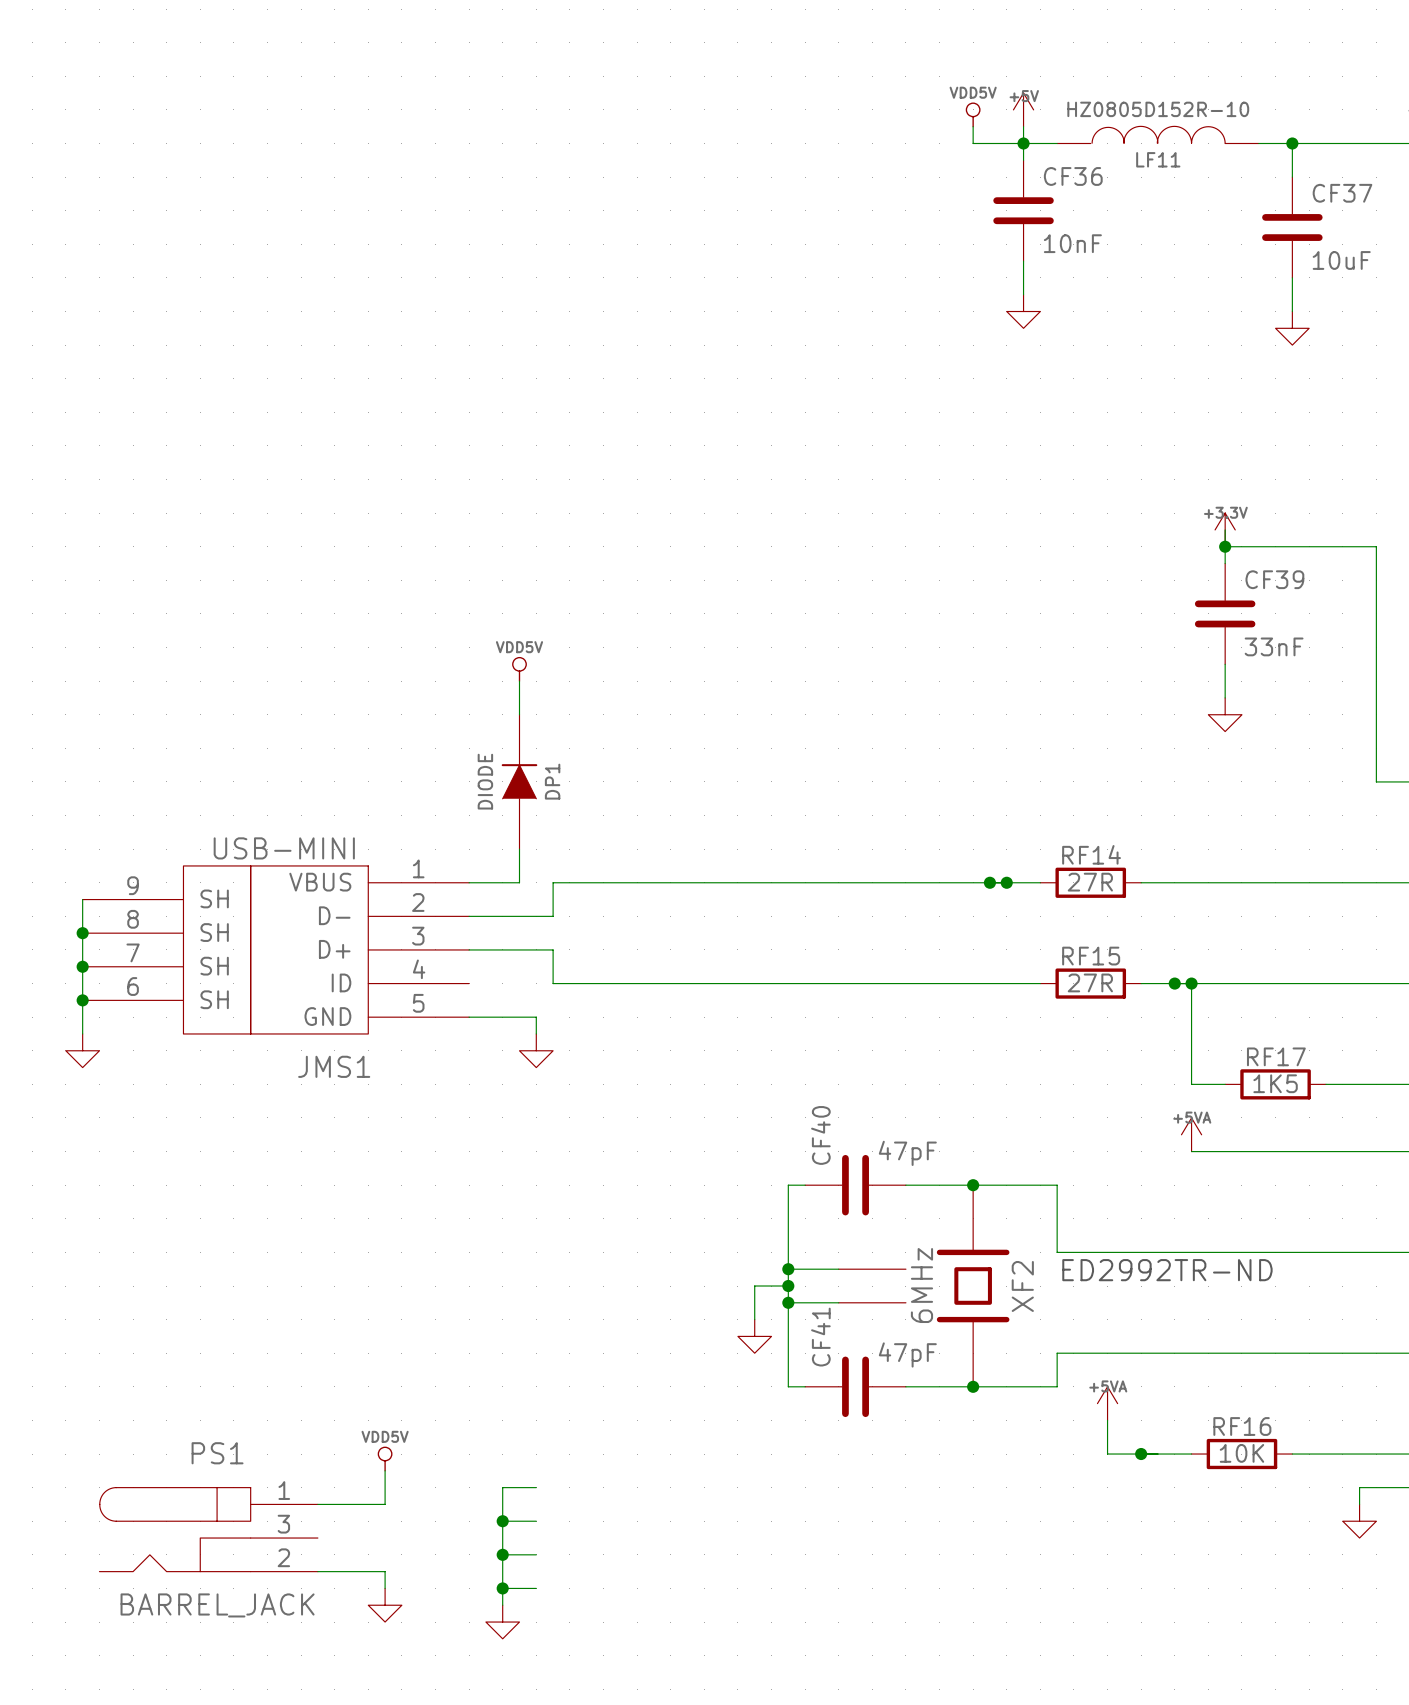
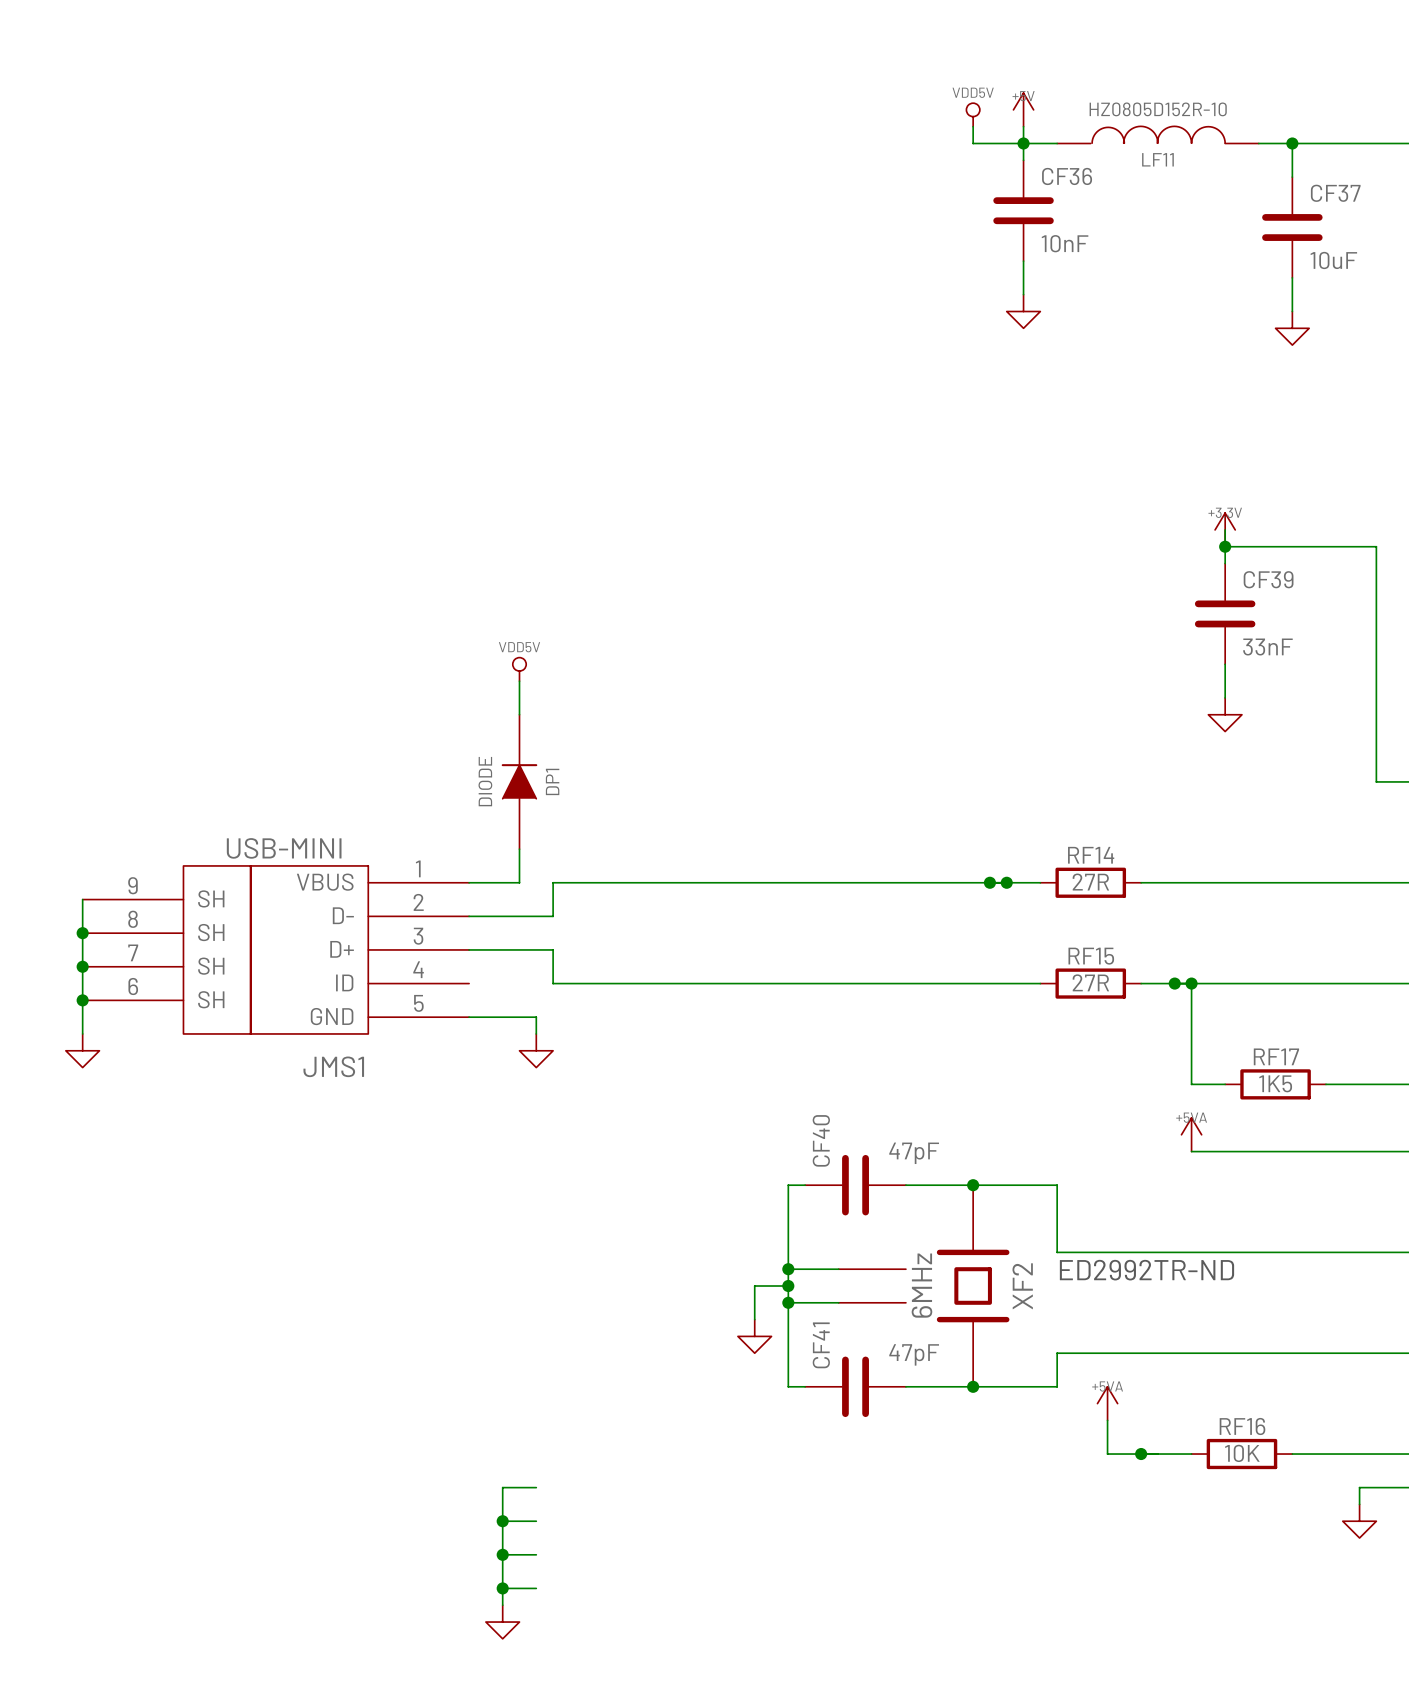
power symbol: VDD5V (385, 1459) -> none
wire: (385, 1470) (385, 1504) (317, 1504) -> none
PS1: BARREL_JACK (208, 1529) -> none
wire: (317, 1571) (385, 1571) (385, 1588) -> none
power symbol: (385, 1605) -> none

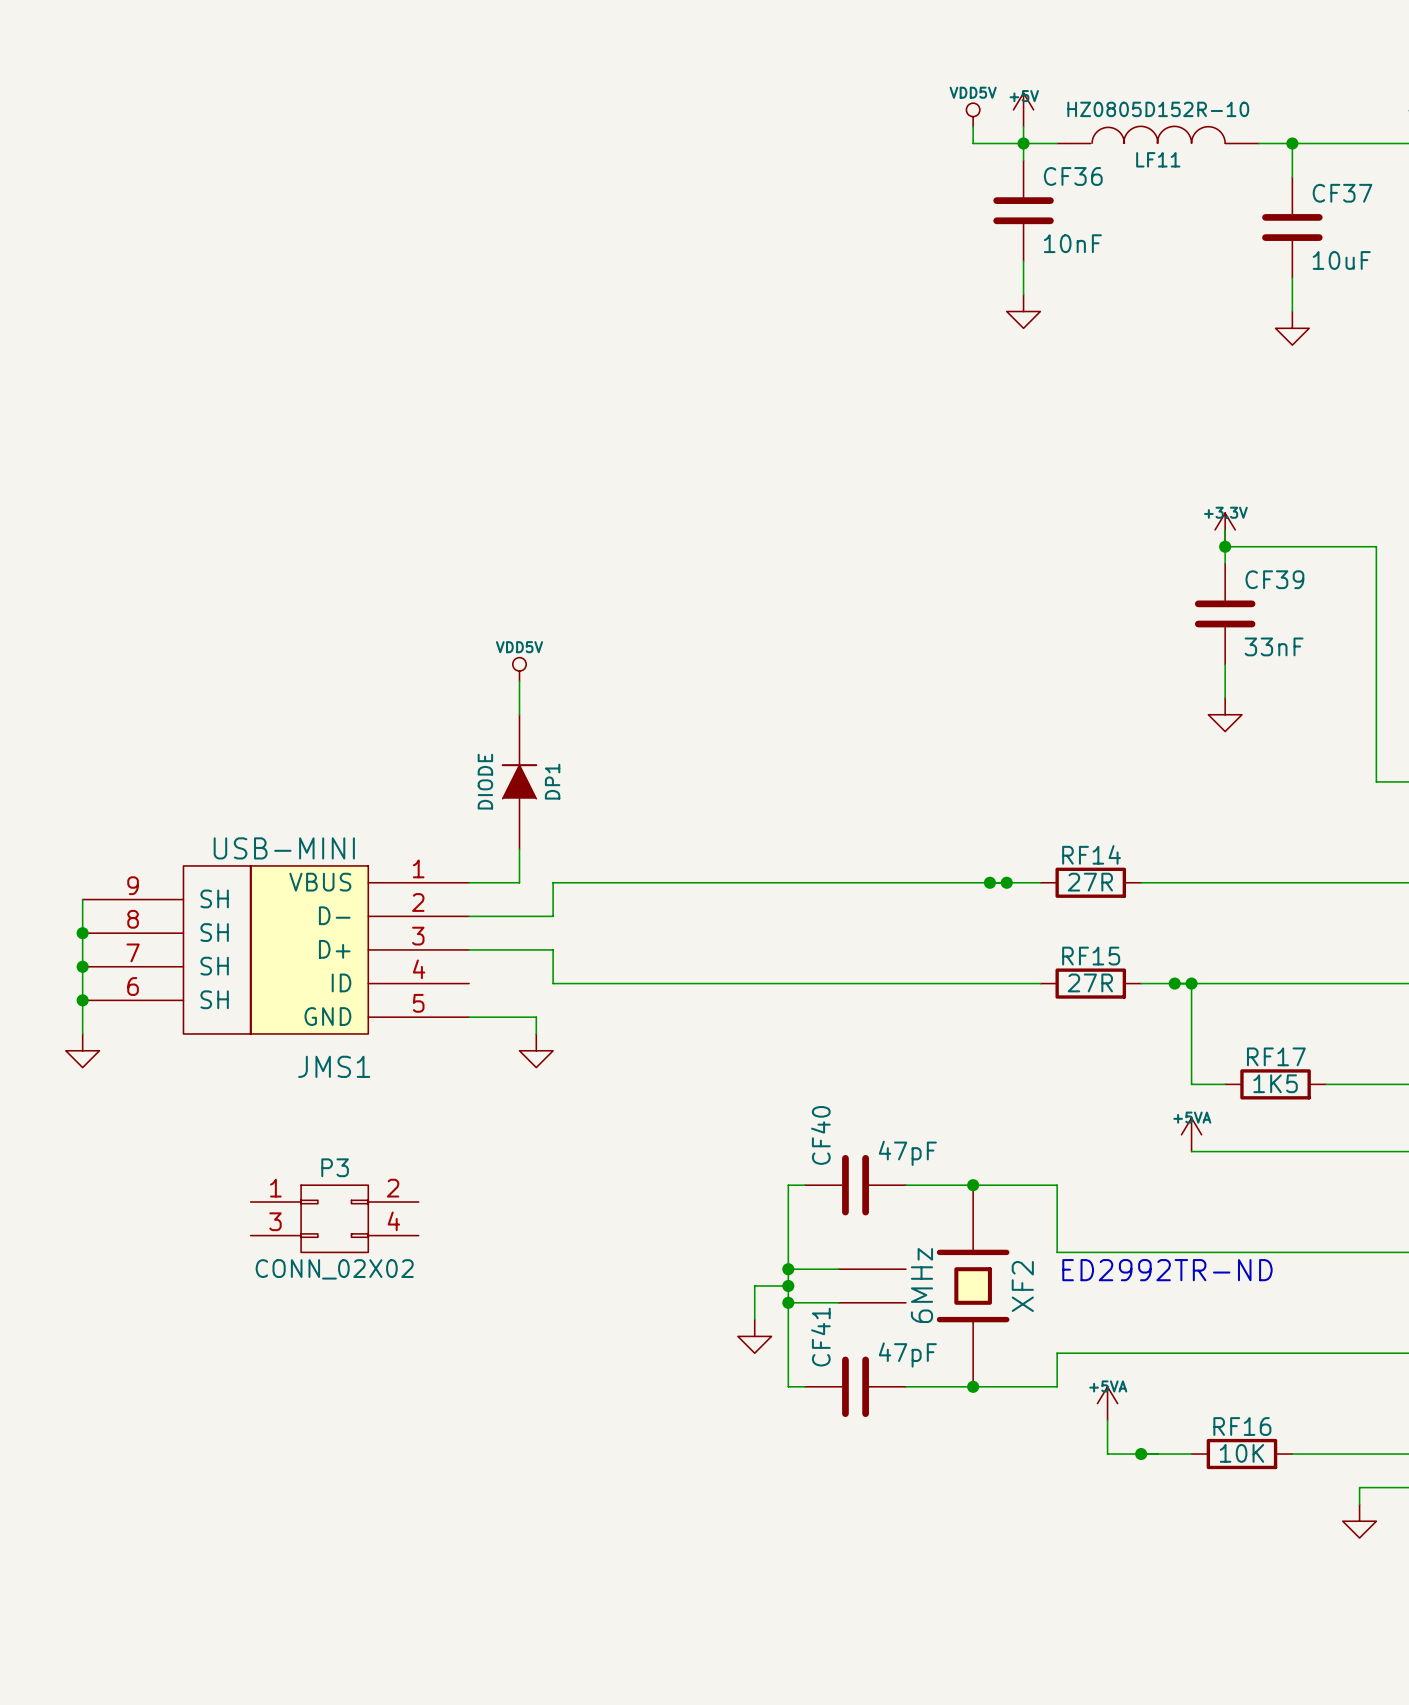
P3: none -> CONN_02X02 (334, 1218)
wire: (536, 1487) (502, 1487) (502, 1605) -> none
wire: (502, 1521) (536, 1521) -> none
junction: (502, 1521) -> none
wire: (502, 1554) (536, 1554) -> none
junction: (502, 1554) -> none
wire: (502, 1588) (536, 1588) -> none
junction: (502, 1588) -> none
power symbol: (502, 1622) -> none

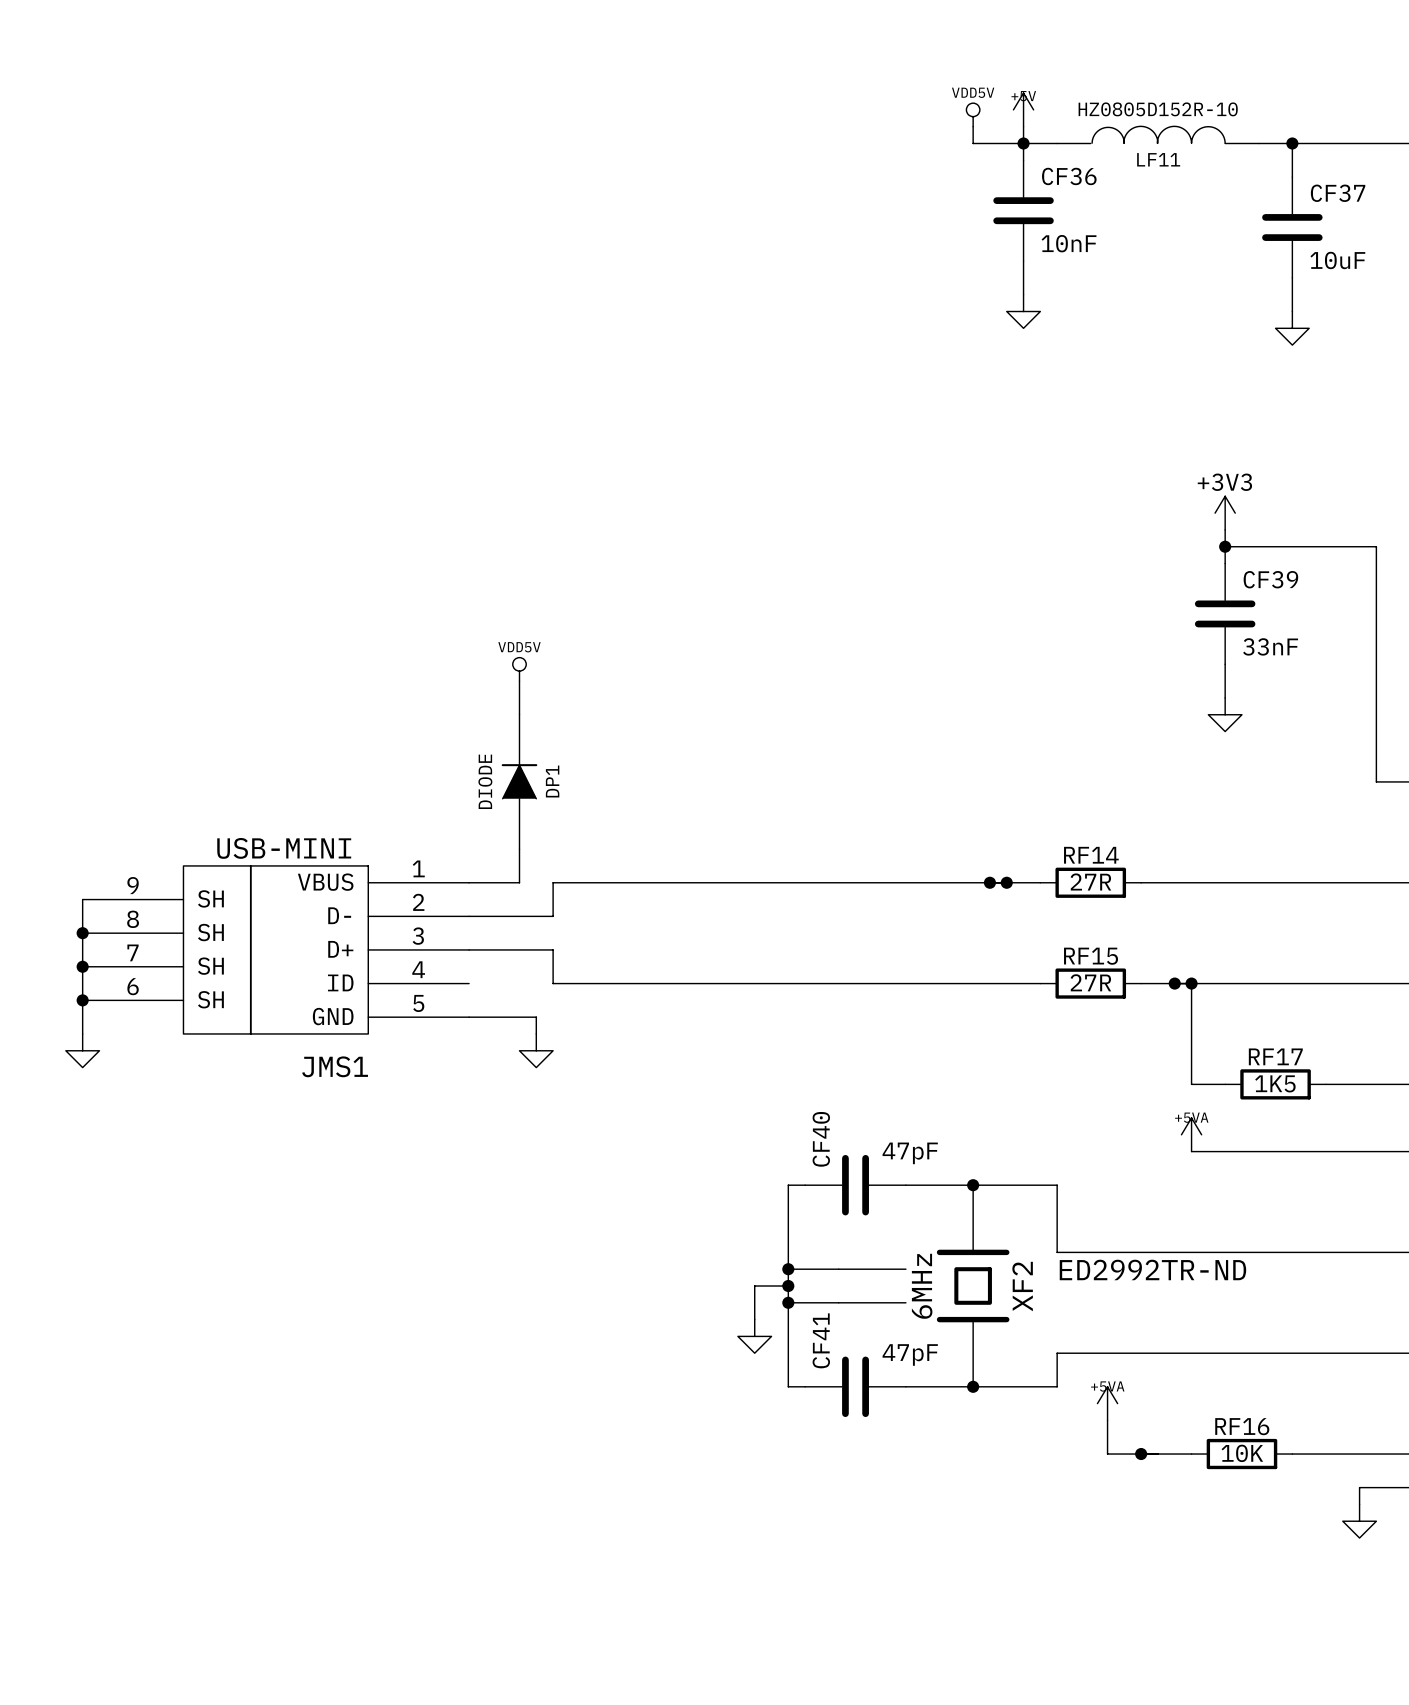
power symbol: none -> +3V3 (1225, 513)
power symbol: +3.3V (1225, 529) -> none
P3: CONN_02X02 (334, 1218) -> none

